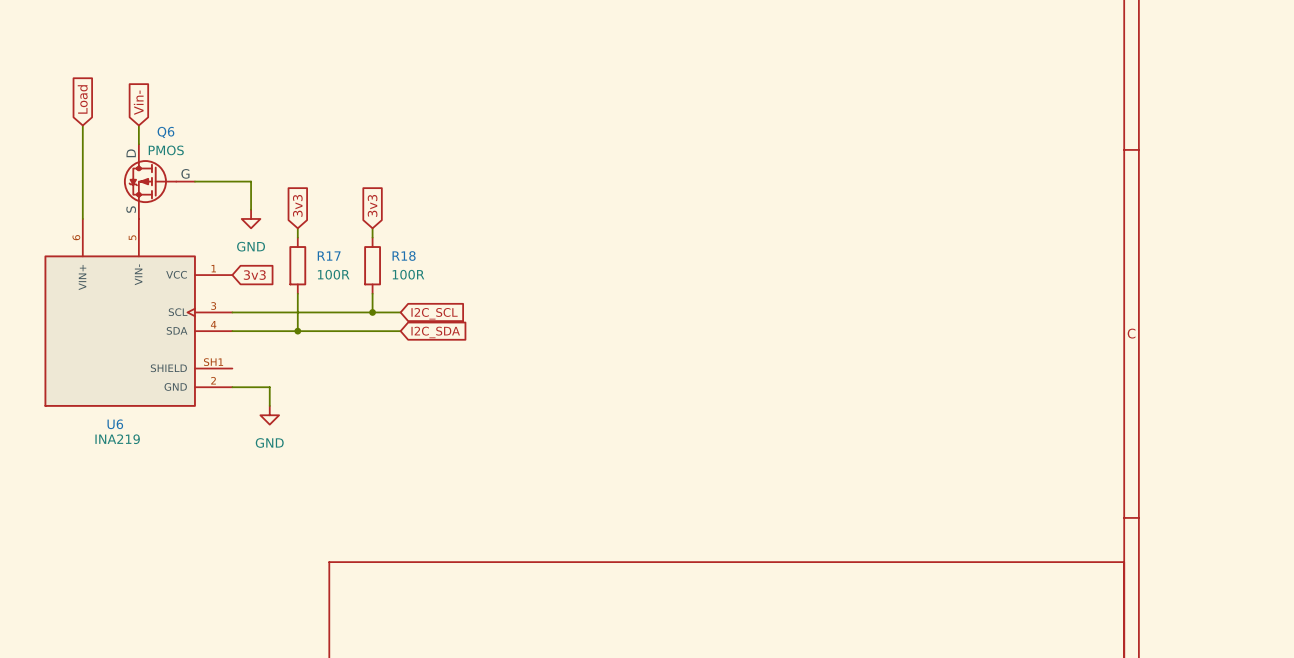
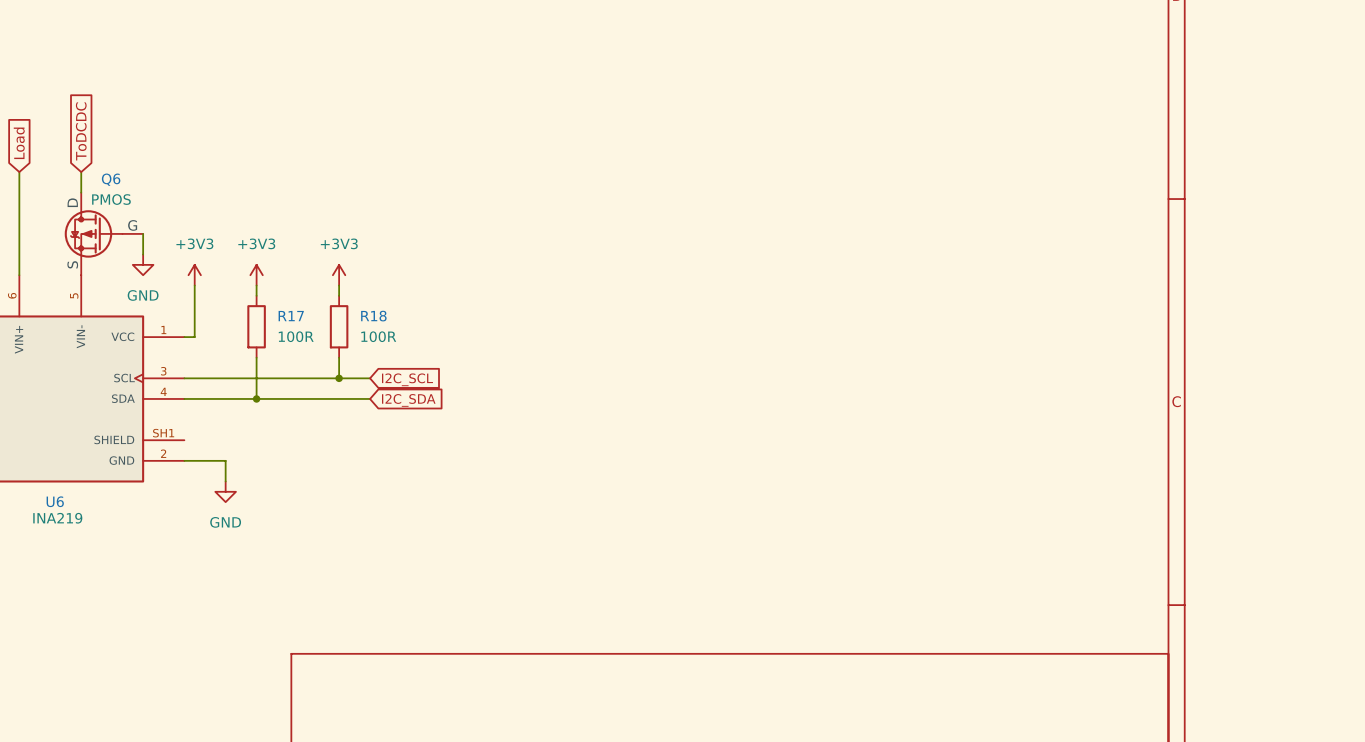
global label: Vin- (138, 102) -> ToDCDC (81, 131)
wire: (194, 181) (251, 181) (251, 209) -> (143, 233) (143, 254)
global label: 3v3 (297, 205) -> none
global label: 3v3 (372, 205) -> none
power symbol: none -> +3V3 (194, 275)
power symbol position: GND (251, 218) -> GND (143, 264)
power symbol: none -> +3V3 (256, 275)
power symbol: none -> +3V3 (339, 275)
wire: none -> (194, 285) (194, 337) (184, 337)
global label: 3v3 (254, 275) -> none

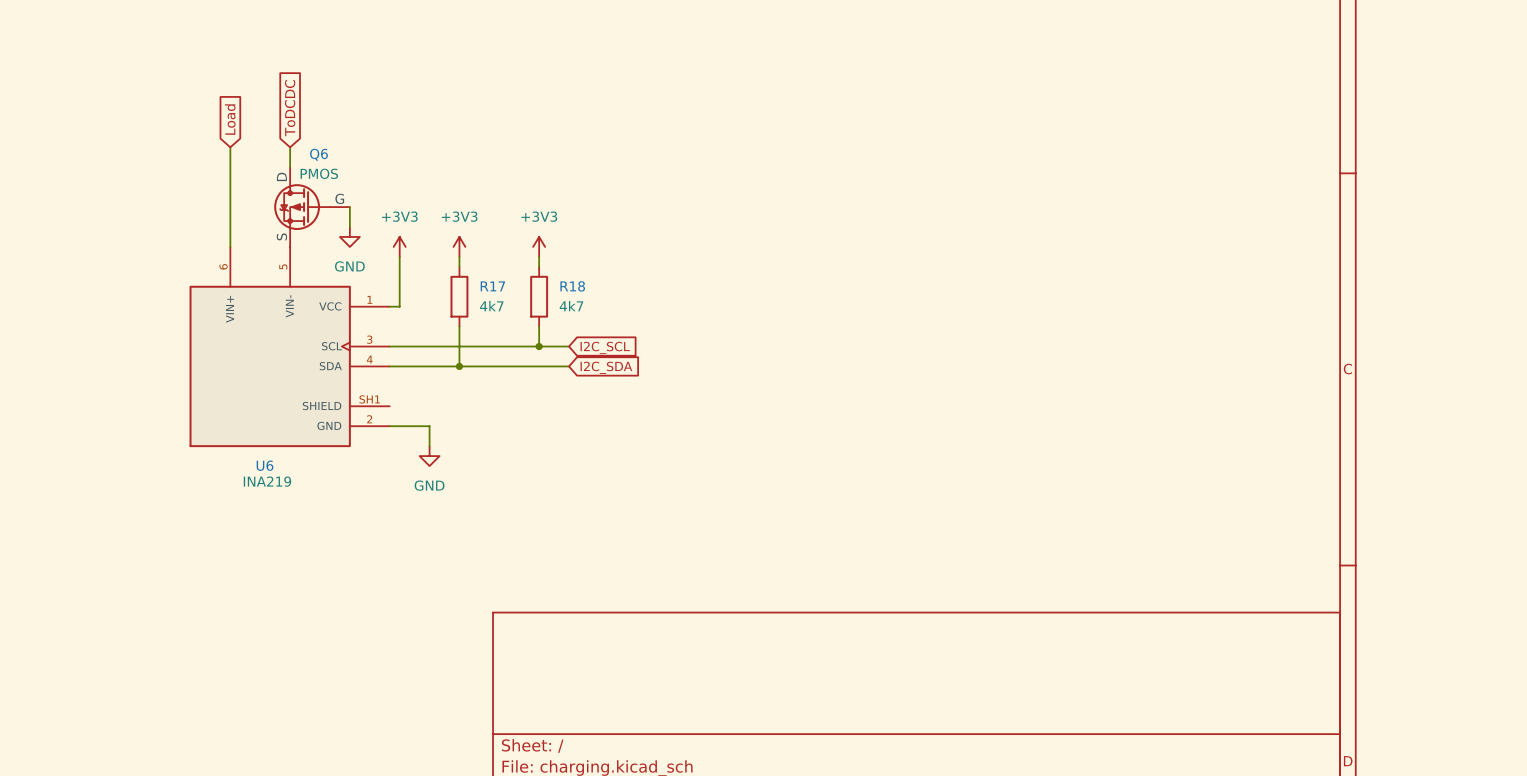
R17 value: 100R (296, 336) -> 4k7 (491, 306)
R18 value: 100R (378, 336) -> 4k7 (571, 306)

